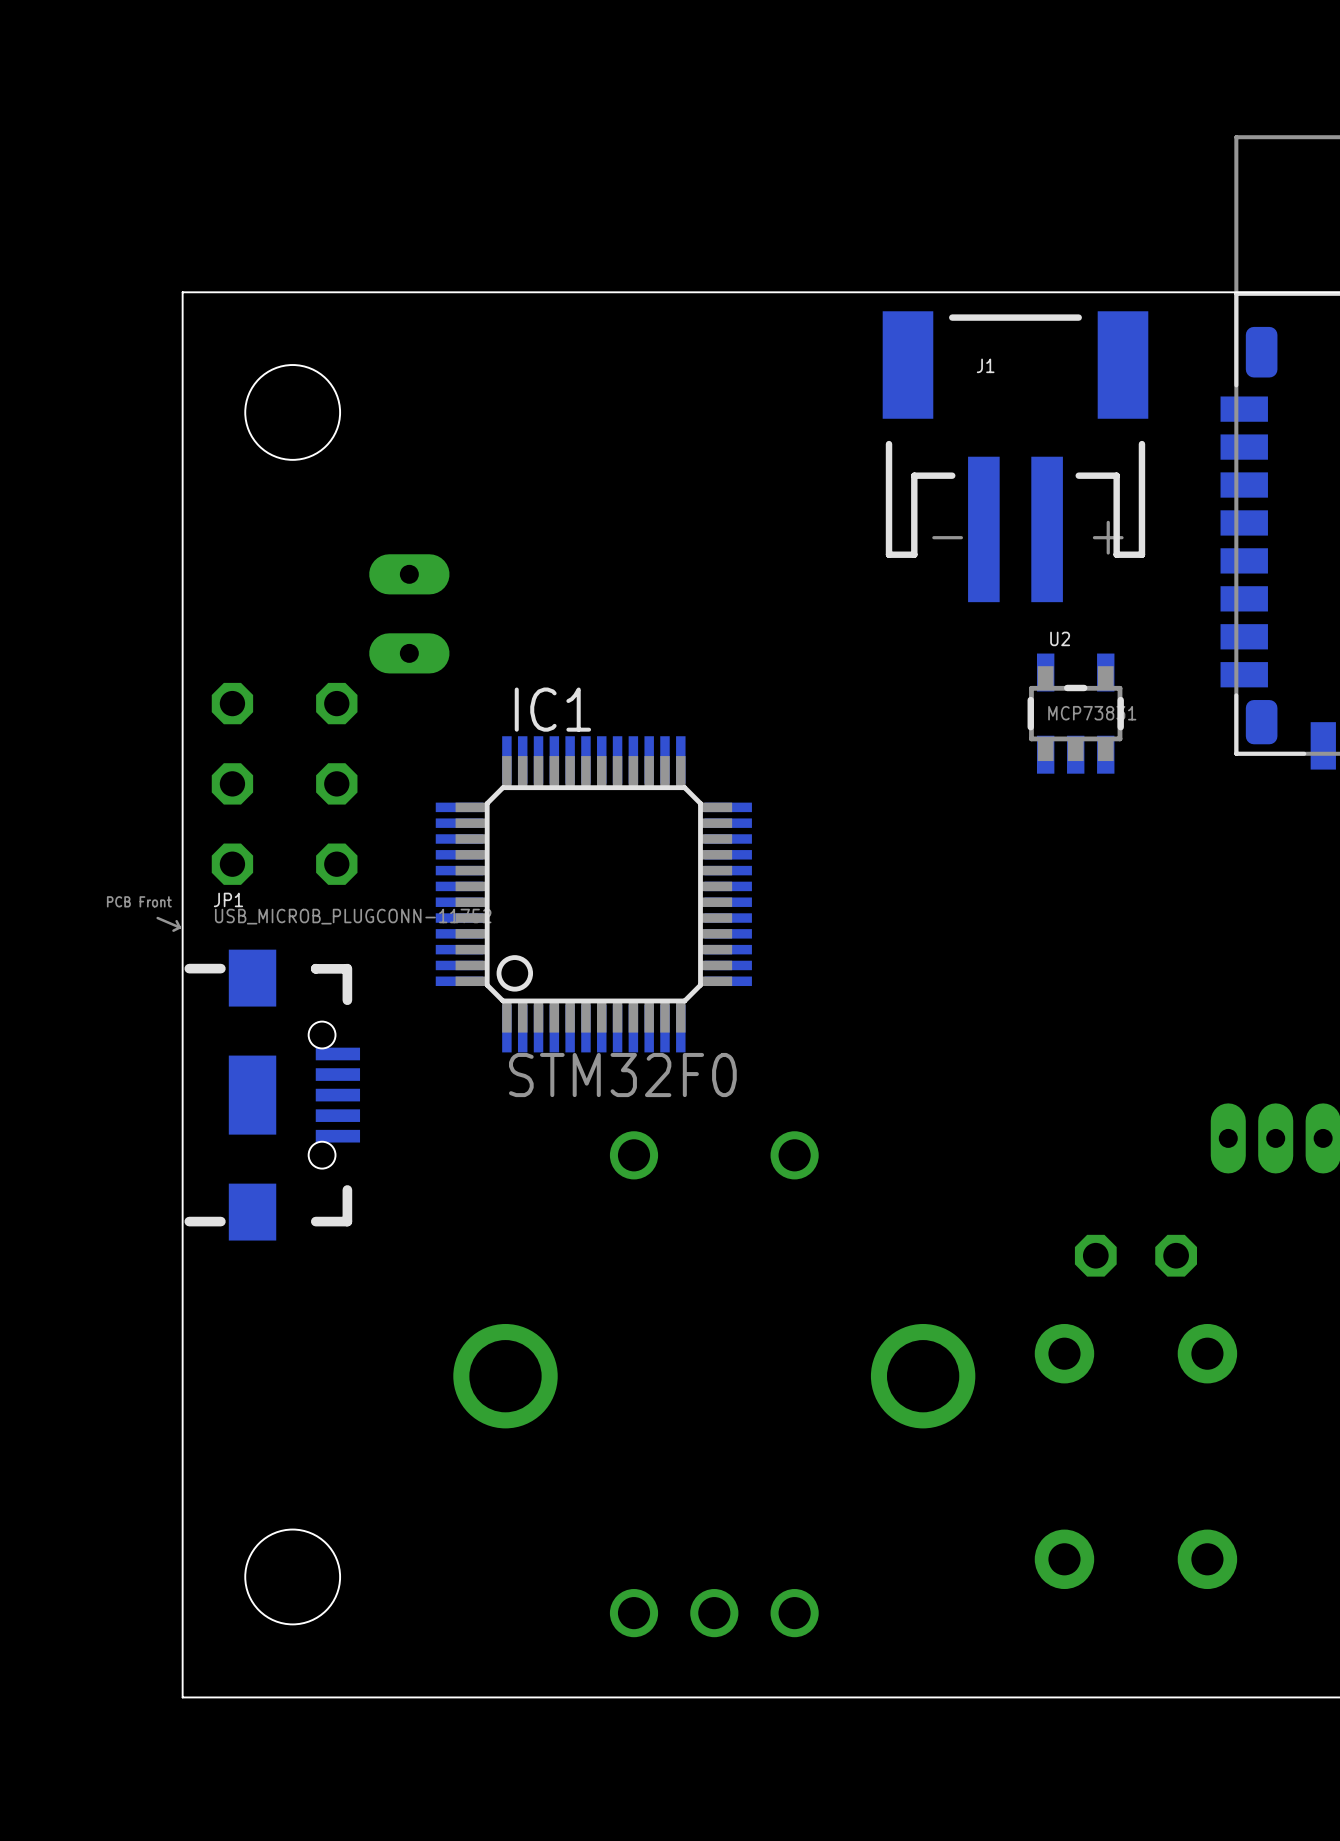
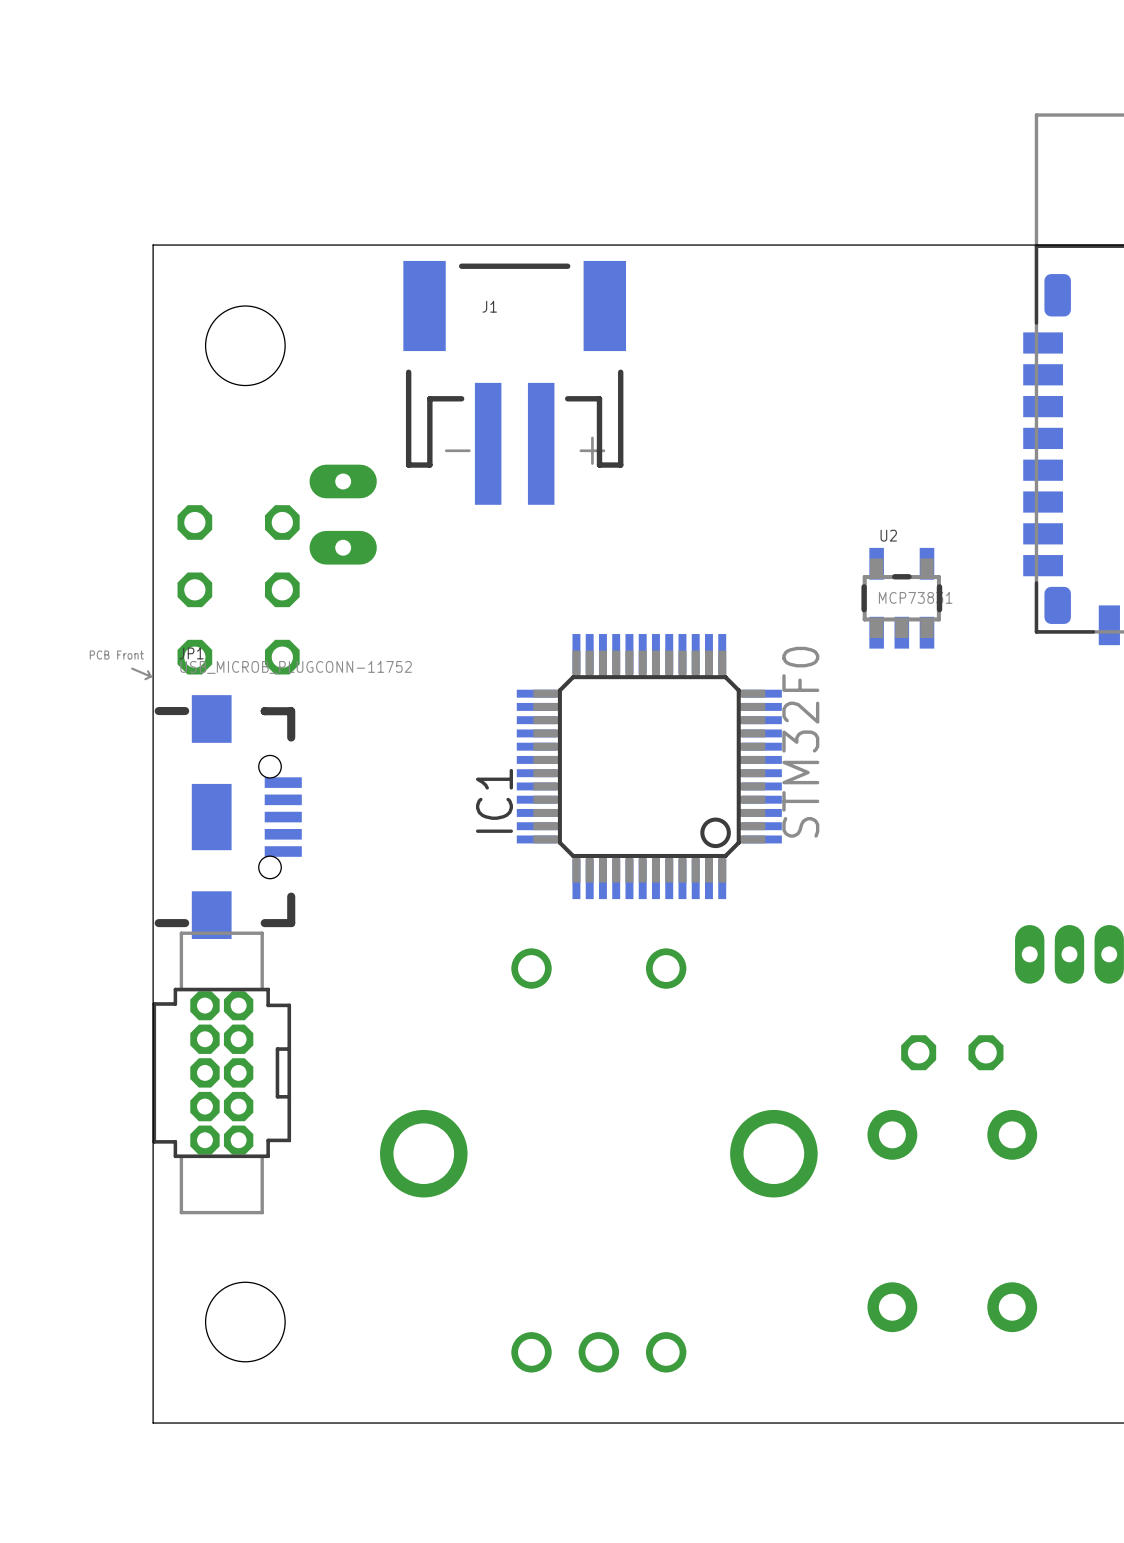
J1 position: (1015, 456) -> (514, 382)
part position: (284, 783) -> (238, 589)
IC1 rotation: 0° (593, 894) -> 90° counterclockwise (649, 766)
JP1 position: (258, 1078) -> (216, 803)
part: none -> (221, 1072)

